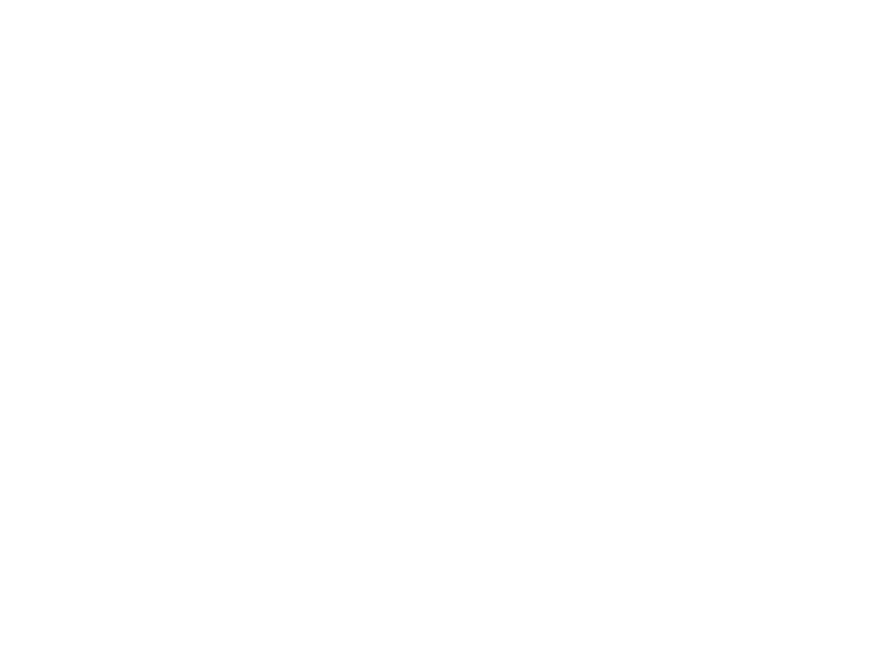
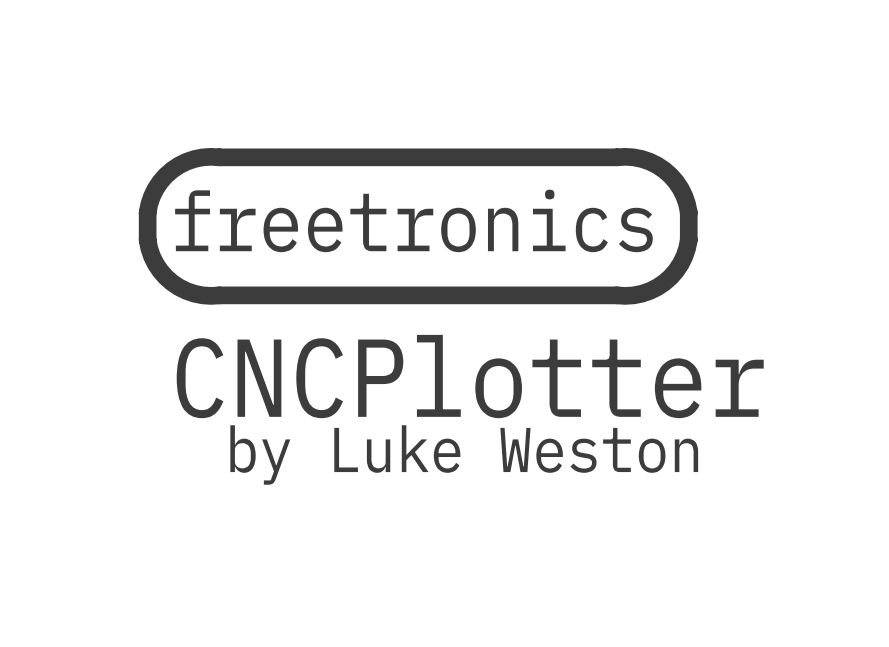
line: none -> (219, 157) (633, 157) (657, 165) (670, 175) (680, 188) (688, 212) (688, 240) (680, 263) (670, 277) (657, 287) (633, 295) (202, 295) (179, 287) (165, 277) (155, 263) (147, 240) (147, 212) (155, 188) (172, 170) (194, 159) (219, 157)
text: none -> freetronics (413, 220)
text: none -> CNCPlotter (470, 376)
text: none -> by Luke Weston (464, 454)

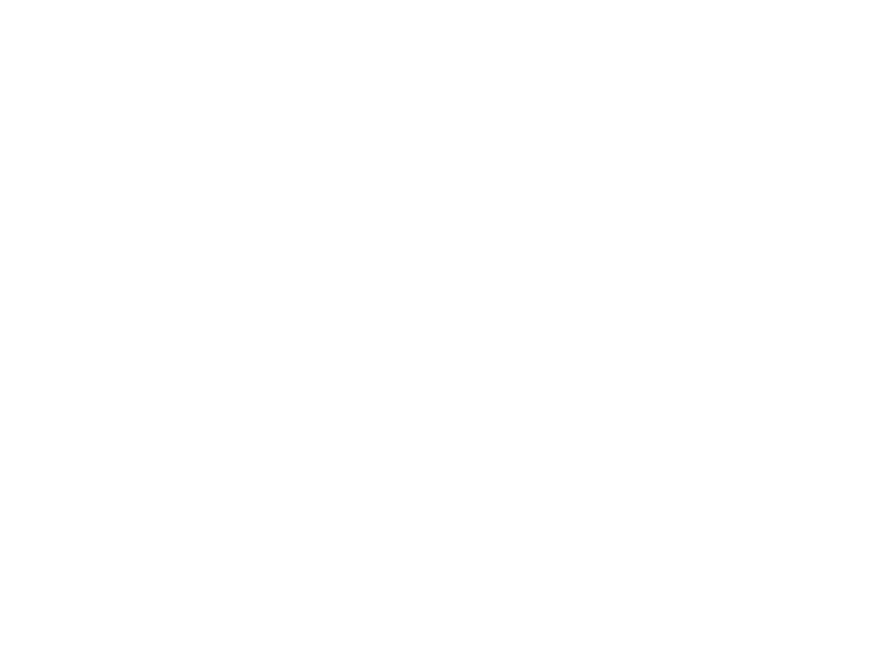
line: (219, 157) (633, 157) (657, 165) (670, 175) (680, 188) (688, 212) (688, 240) (680, 263) (670, 277) (657, 287) (633, 295) (202, 295) (179, 287) (165, 277) (155, 263) (147, 240) (147, 212) (155, 188) (172, 170) (194, 159) (219, 157) -> none
text: freetronics (413, 220) -> none
text: CNCPlotter (470, 376) -> none
text: by Luke Weston (464, 454) -> none

